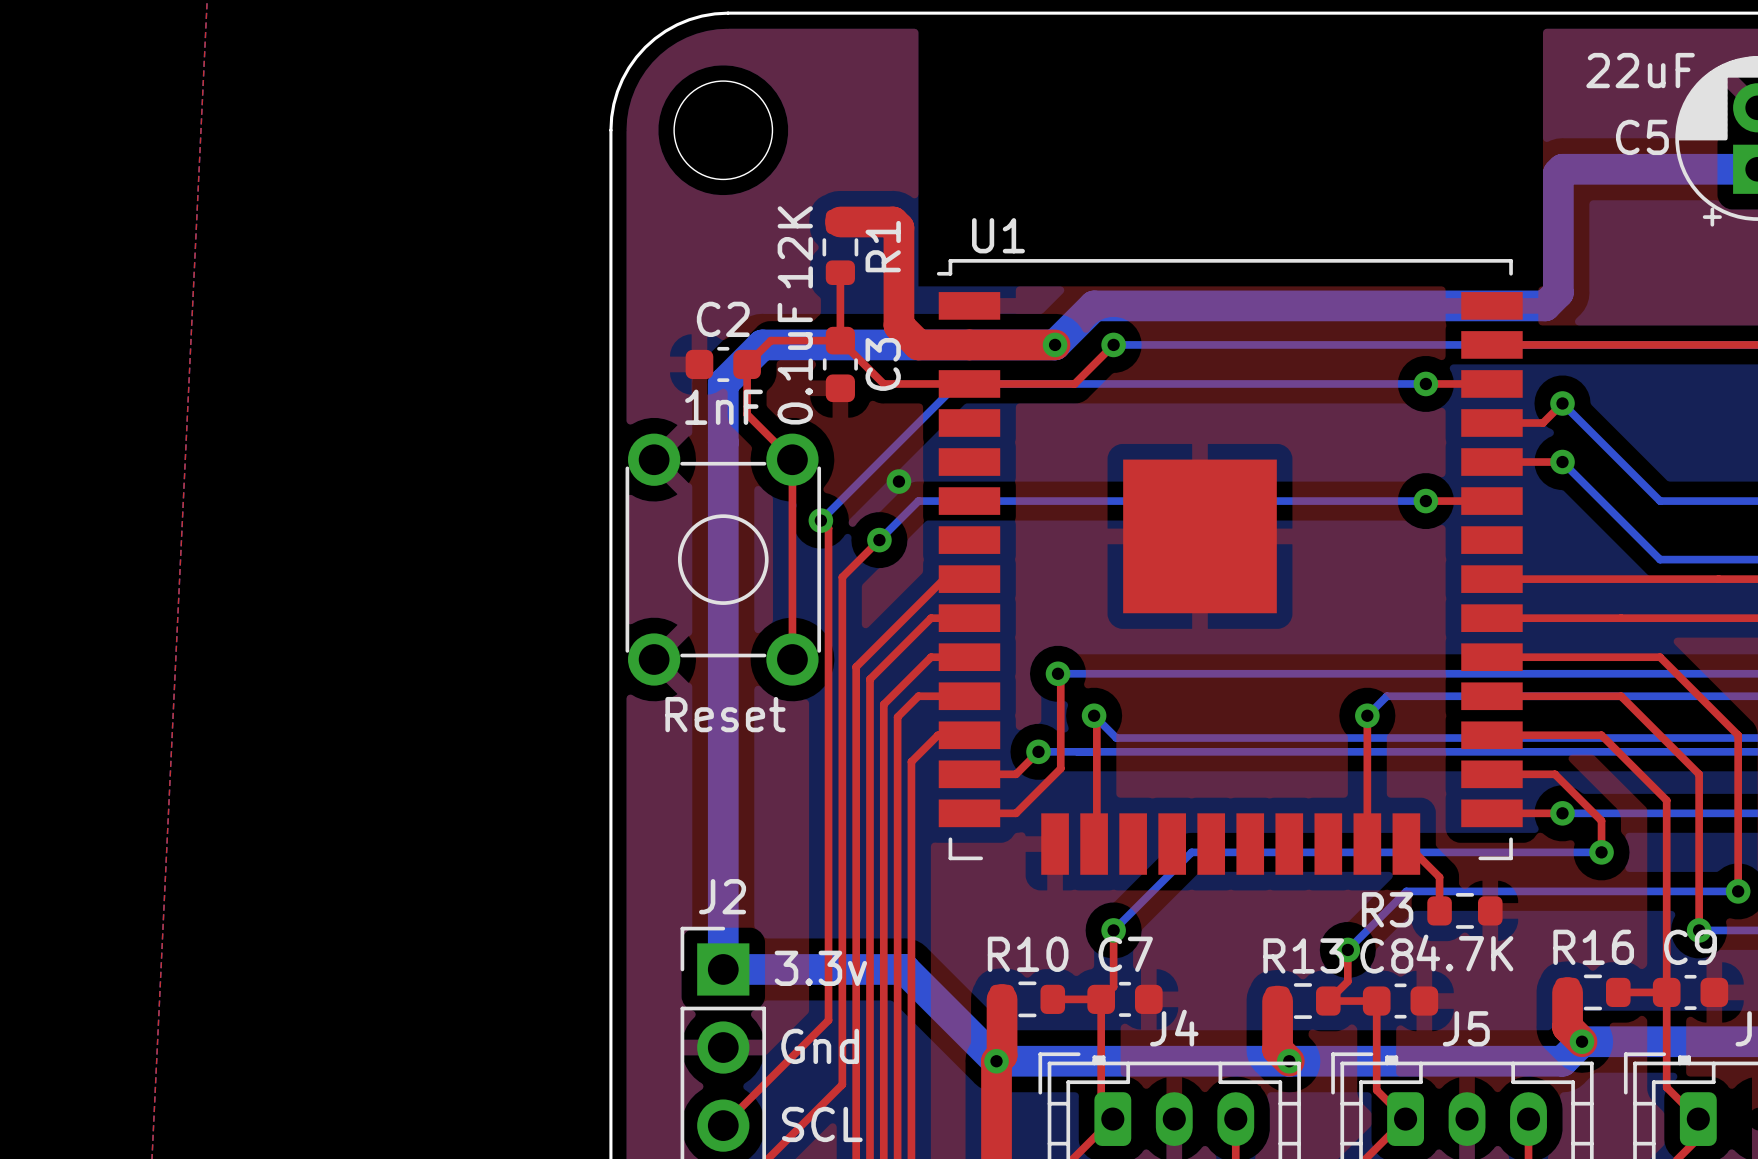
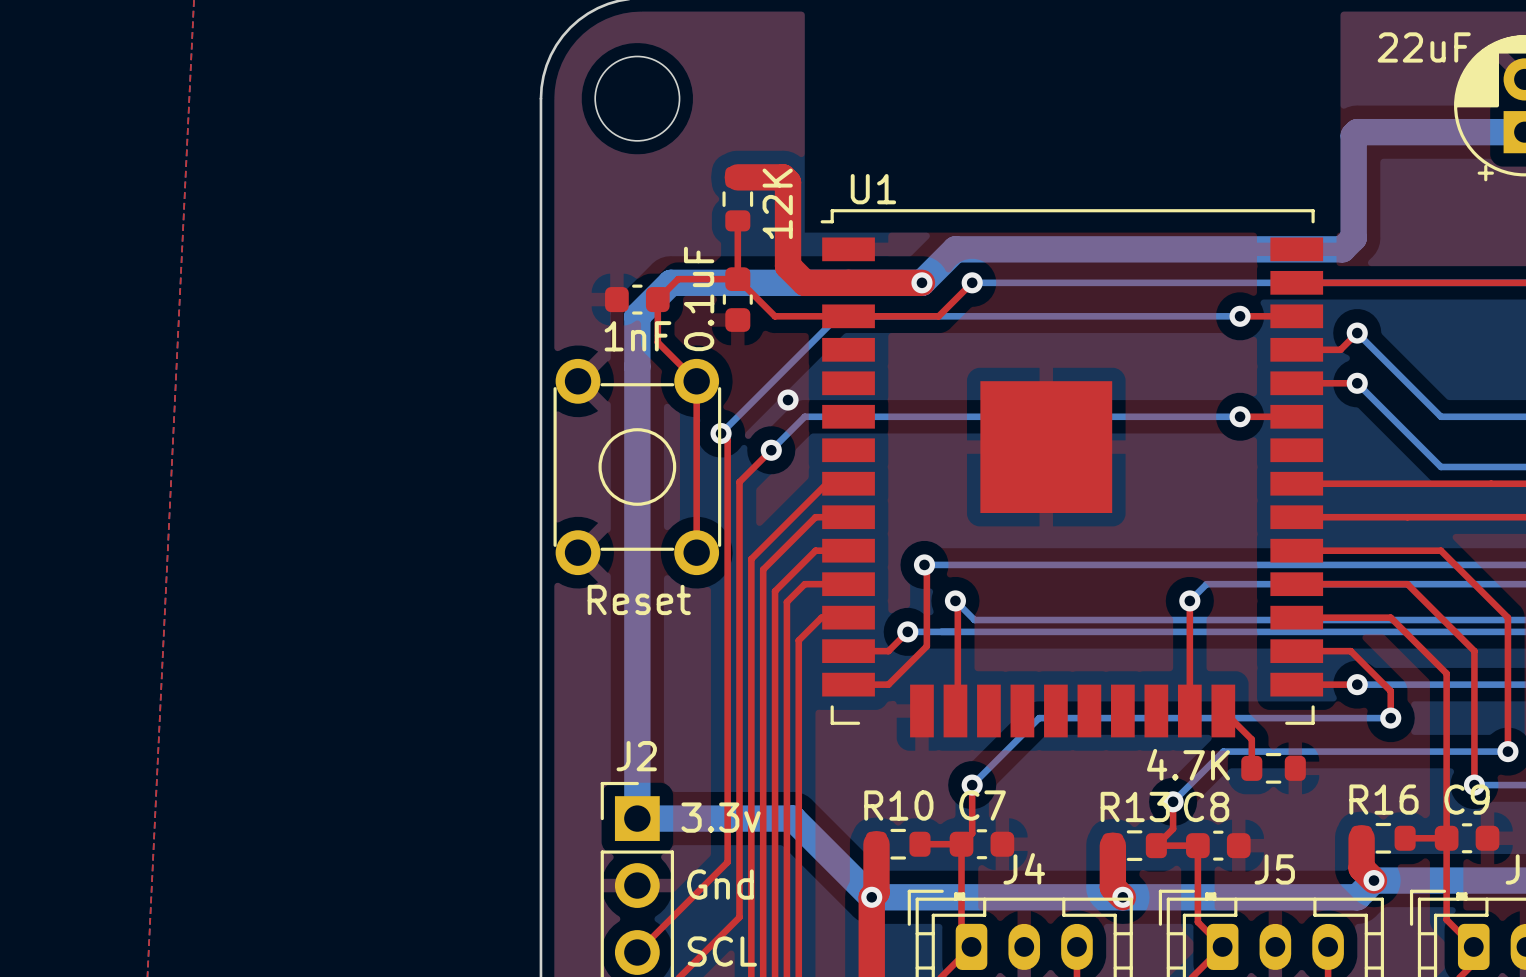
C5 name: C5 (1642, 137) -> none
R1 name: R1 (883, 246) -> none
R1 value position: 12K (795, 247) -> 12K (777, 203)
C2 name: C2 (723, 319) -> none
C3 name: C3 (883, 364) -> none
R3 name: R3 (1387, 909) -> none
R3 value position: 4.7K (1464, 952) -> 4.7K (1188, 764)

